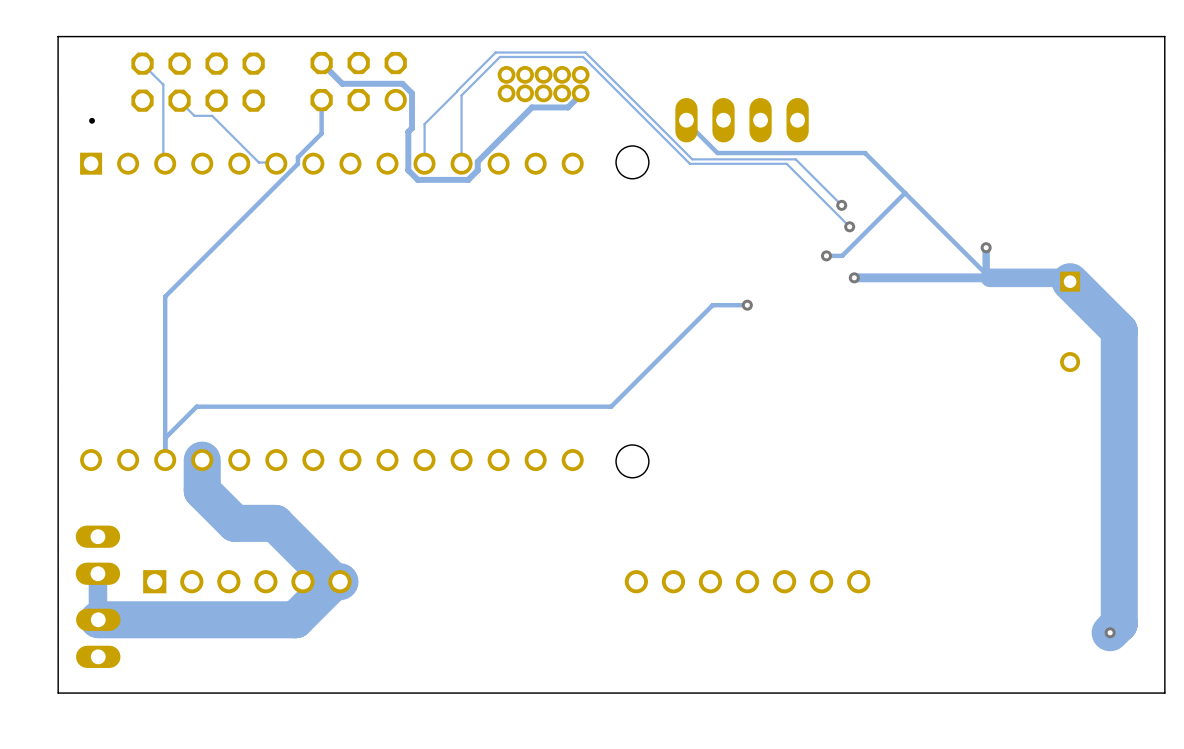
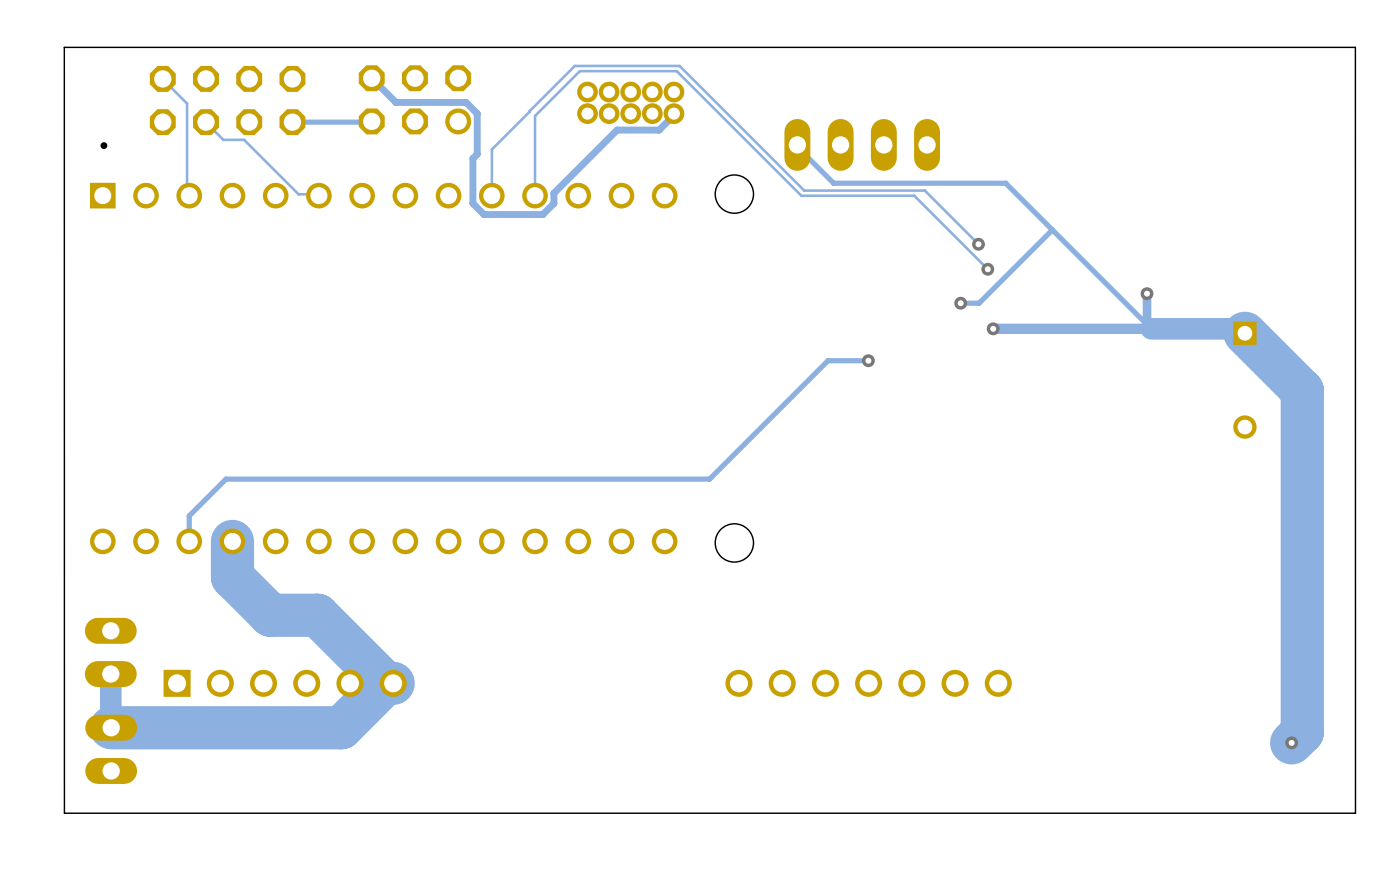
track: (321, 100) (321, 133) (297, 157) (297, 163) (165, 296) (165, 438) -> (371, 121) (292, 122)

